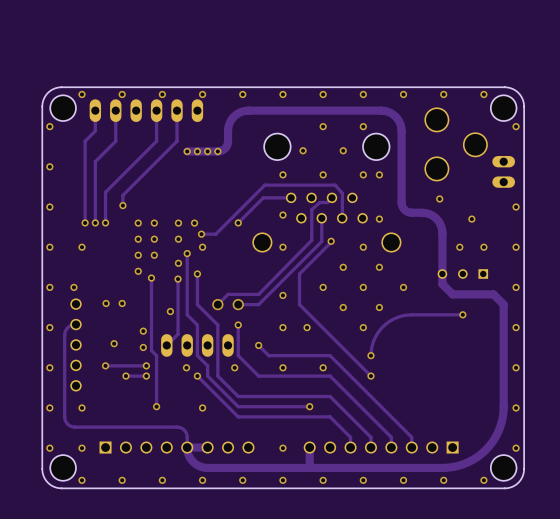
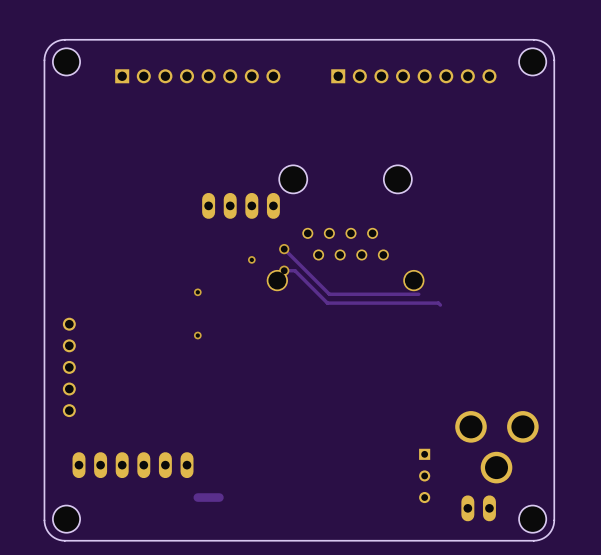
part: none -> (197, 76)
part: none -> (413, 76)
via: (81, 94) -> none
via: (122, 94) -> none
via: (162, 94) -> none
via: (202, 94) -> none
via: (242, 94) -> none
via: (282, 94) -> none
via: (323, 94) -> none
via: (363, 94) -> none
via: (403, 94) -> none
via: (443, 94) -> none
via: (483, 94) -> none
board edge: (524, 106) (518, 92) (504, 87) (61, 87) (47, 92) (42, 106) -> (554, 136) (553, 54) (546, 44) (533, 39) (62, 39) (50, 45) (44, 57) (44, 136)
hole position: (63, 108) -> (66, 61)
hole position: (503, 108) -> (532, 61)
track: (95, 110) (95, 131) (85, 141) (85, 222) -> none
track: (115, 110) (115, 141) (95, 161) (95, 222) -> none
part: (146, 110) -> none
track: (156, 110) (156, 141) (105, 192) (105, 222) -> none
track: (177, 110) (177, 141) (122, 195) (122, 205) -> none
via: (49, 126) -> none
via: (323, 126) -> none
via: (363, 126) -> none
via: (516, 126) -> none
part: (456, 144) -> none
via: (303, 150) -> none
via: (343, 150) -> none
track: (187, 151) (217, 151) (224, 149) (227, 143) (228, 128) (230, 120) (238, 113) (245, 110) (381, 110) (388, 112) (395, 116) (401, 128) (401, 205) (409, 212) (429, 214) (439, 222) (442, 233) (442, 284) (452, 294) (493, 294) (503, 304) (503, 412) (499, 427) (492, 441) (473, 459) (447, 467) (202, 467) (195, 463) (189, 457) (186, 433) (179, 427) (74, 427) (67, 424) (64, 416) (64, 333) (68, 326) (76, 324) -> none
via: (187, 151) -> none
via: (197, 151) -> none
via: (207, 151) -> none
via: (217, 151) -> none
via: (49, 166) -> none
part: none -> (241, 205)
part: (503, 171) -> none
via: (282, 174) -> none
via: (323, 174) -> none
via: (363, 174) -> none
via: (379, 174) -> none
track: (291, 197) (263, 197) (238, 222) -> none
track: (331, 197) (327, 202) (319, 202) (311, 209) (311, 240) (258, 294) (228, 294) (217, 304) -> none
via: (439, 198) -> none
via: (122, 205) -> none
via: (49, 207) -> none
via: (516, 207) -> none
track: none -> (284, 249) (329, 294) (418, 294)
via: none -> (284, 249)
via: (282, 215) -> none
track: (321, 218) (321, 241) (258, 304) (238, 304) -> none
track: (342, 218) (342, 193) (335, 185) (264, 185) (215, 234) (201, 234) -> none
via: (379, 219) -> none
via: (471, 219) -> none
via: (85, 222) -> none
via: (95, 222) -> none
via: (105, 222) -> none
via: (138, 223) -> none
via: (154, 223) -> none
via: (178, 223) -> none
via: (194, 223) -> none
track: none -> (284, 270) (295, 270) (327, 303) (438, 303) (440, 305)
via: none -> (284, 270)
via: (201, 234) -> none
via: (138, 239) -> none
via: (154, 239) -> none
via: (178, 239) -> none
track: (331, 241) (299, 273) (299, 304) (370, 376) -> none
via: (331, 241) -> none
via: (49, 247) -> none
via: (81, 247) -> none
via: (202, 247) -> none
via: (282, 247) -> none
via: (363, 247) -> none
via: (459, 247) -> none
via: (483, 247) -> none
via: (516, 247) -> none
track: (187, 253) (187, 314) (197, 325) (197, 355) (207, 365) (207, 376) (238, 406) (309, 406) -> none
via: (138, 255) -> none
via: (154, 255) -> none
via: (178, 263) -> none
via: (343, 267) -> none
via: (379, 267) -> none
via: (138, 271) -> none
track: (197, 273) (197, 304) (217, 325) (217, 376) (238, 396) (330, 396) (370, 437) (370, 447) -> none
via: (197, 273) -> none
part: (462, 273) -> none
track: (151, 278) (151, 350) (156, 355) (156, 406) -> none
via: (151, 278) -> none
track: (178, 279) (178, 334) (166, 345) -> none
via: (178, 279) -> none
via: (49, 287) -> none
via: (73, 287) -> none
via: (323, 287) -> none
via: (363, 287) -> none
via: (403, 287) -> none
via: (516, 287) -> none
via: none -> (197, 335)
via: (282, 295) -> none
via: (106, 303) -> none
via: (122, 303) -> none
via: (217, 304) -> none
via: (238, 304) -> none
via: (343, 307) -> none
via: (379, 307) -> none
via: (170, 311) -> none
track: (462, 314) (407, 315) (394, 318) (382, 326) (377, 333) (371, 346) (370, 355) -> none
via: (462, 314) -> none
part: none -> (69, 367)
track: (238, 325) (238, 355) (258, 376) (330, 376) (391, 437) (391, 447) -> none
via: (238, 325) -> none
via: (49, 327) -> none
via: (282, 327) -> none
via: (307, 327) -> none
via: (363, 327) -> none
via: (516, 327) -> none
via: (143, 331) -> none
via: (114, 343) -> none
part: (76, 344) -> none
part: (197, 345) -> none
track: (258, 345) (268, 355) (330, 355) (411, 437) (411, 447) -> none
via: (258, 345) -> none
via: (143, 347) -> none
via: (370, 355) -> none
via: (105, 365) -> none
track: (146, 365) (105, 365) -> none
via: (146, 365) -> none
via: (49, 367) -> none
via: (186, 367) -> none
via: (234, 367) -> none
via: (282, 367) -> none
via: (323, 367) -> none
via: (516, 367) -> none
via: (125, 376) -> none
track: (146, 376) (125, 376) -> none
via: (146, 376) -> none
track: (197, 376) (238, 416) (330, 416) (350, 437) (350, 447) -> none
via: (197, 376) -> none
via: (370, 376) -> none
part: none -> (496, 447)
via: (156, 406) -> none
via: (309, 406) -> none
via: (49, 407) -> none
via: (81, 407) -> none
via: (202, 407) -> none
via: (516, 407) -> none
part: none -> (133, 465)
part: none -> (424, 475)
part: (177, 447) -> none
track: (309, 447) (309, 467) -> none
part: (381, 447) -> none
via: (49, 448) -> none
via: (81, 448) -> none
via: (282, 448) -> none
via: (516, 448) -> none
part: none -> (478, 508)
via: (81, 480) -> none
via: (122, 480) -> none
via: (162, 480) -> none
via: (202, 480) -> none
via: (242, 480) -> none
via: (282, 480) -> none
via: (323, 480) -> none
via: (363, 480) -> none
via: (403, 480) -> none
via: (443, 480) -> none
via: (483, 480) -> none

